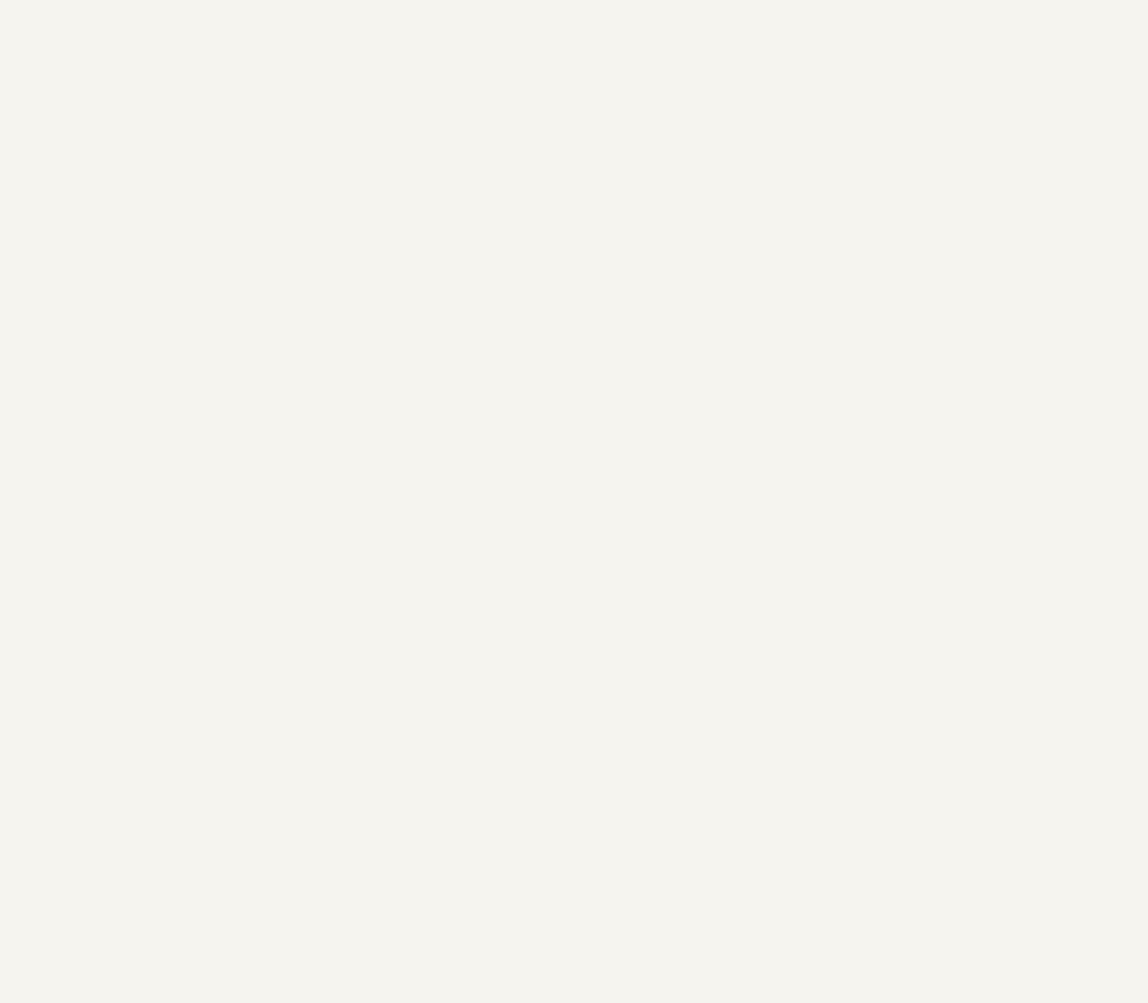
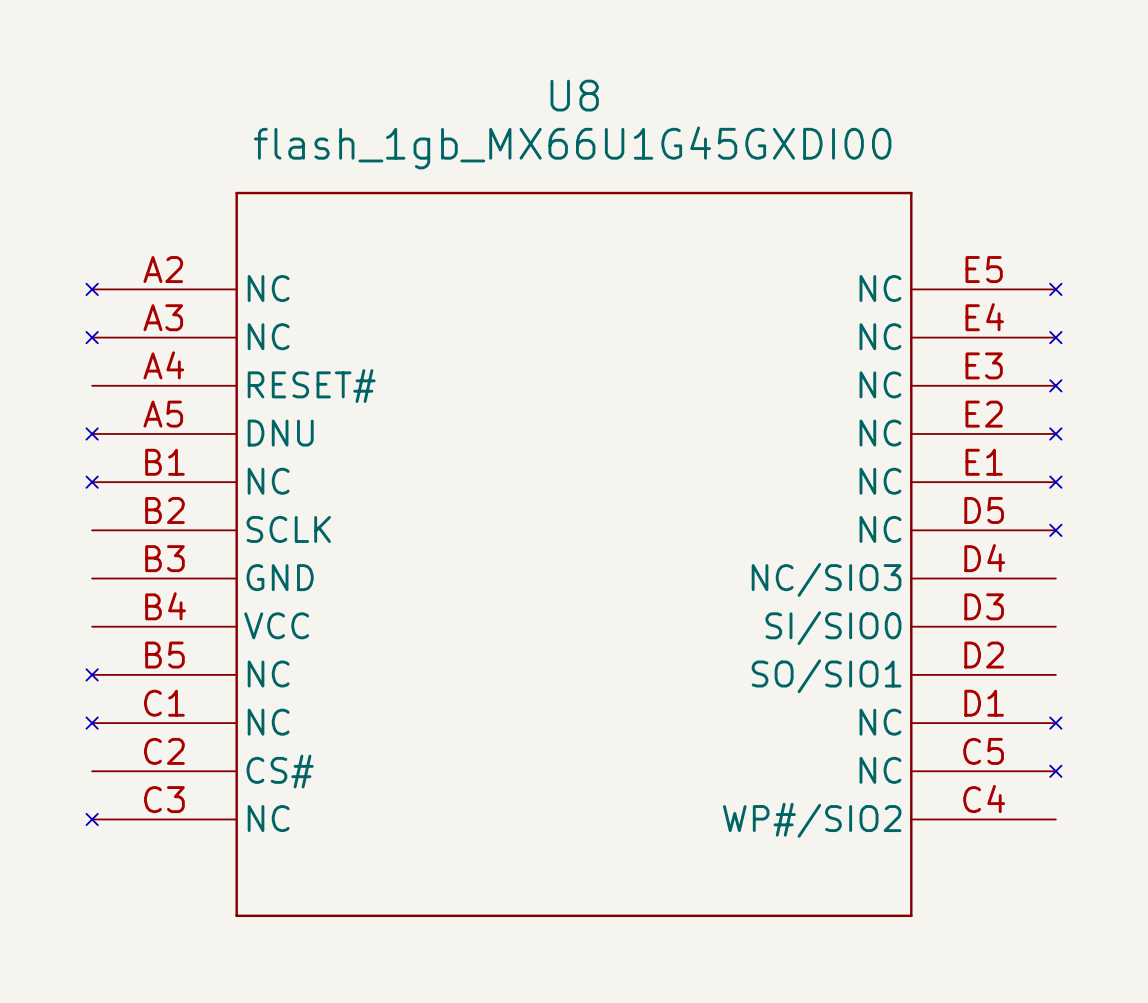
U8: none -> flash_1gb_MX66U1G45GXDI00 (573, 554)

